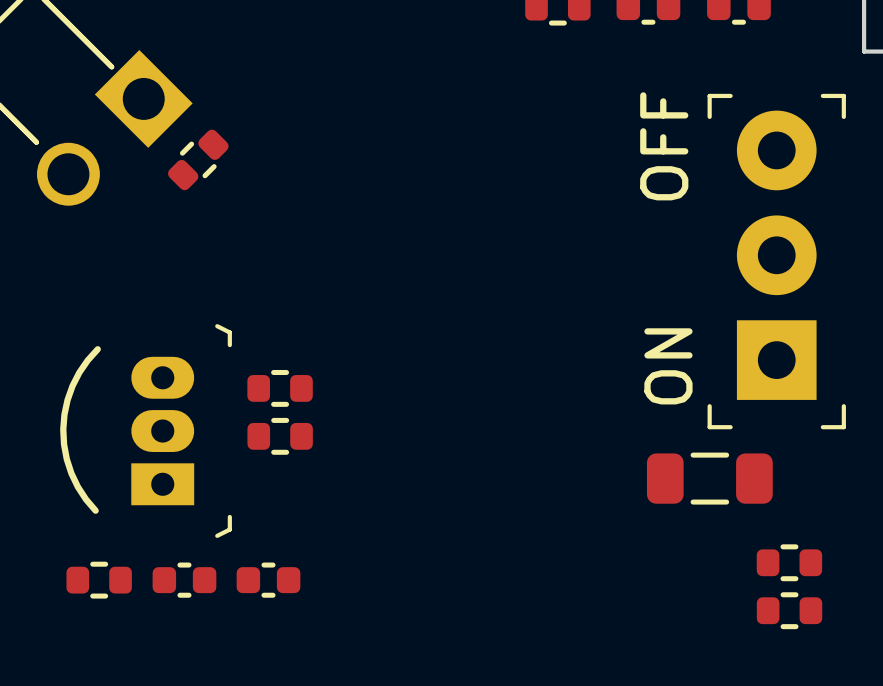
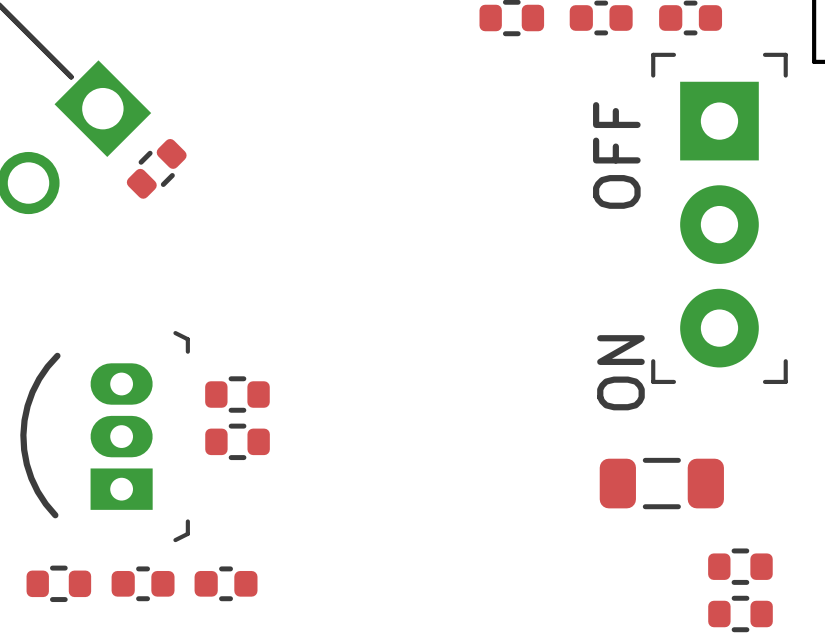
part rotation: 0° (776, 261) -> 180° (719, 218)

